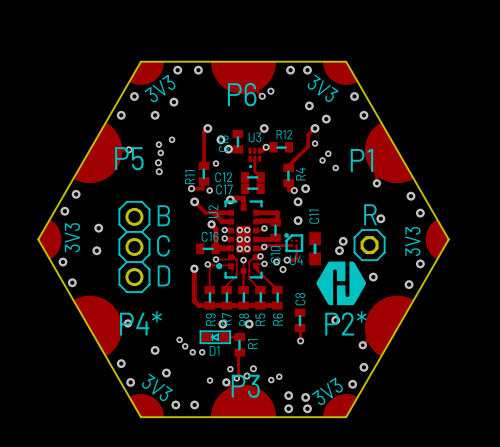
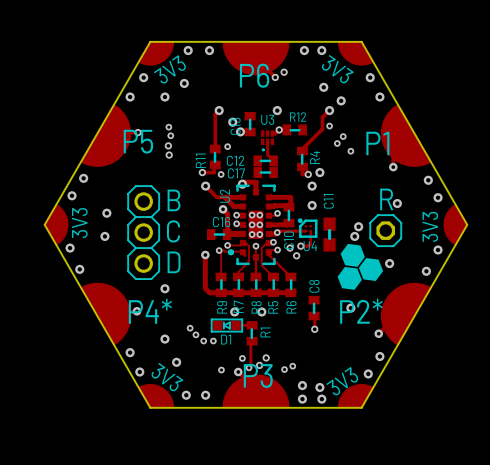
via: (172, 139) -> none
drawing: none -> [337, 243, 384, 290]
drawing: [316, 261, 367, 306] -> none
via: none -> (164, 288)

